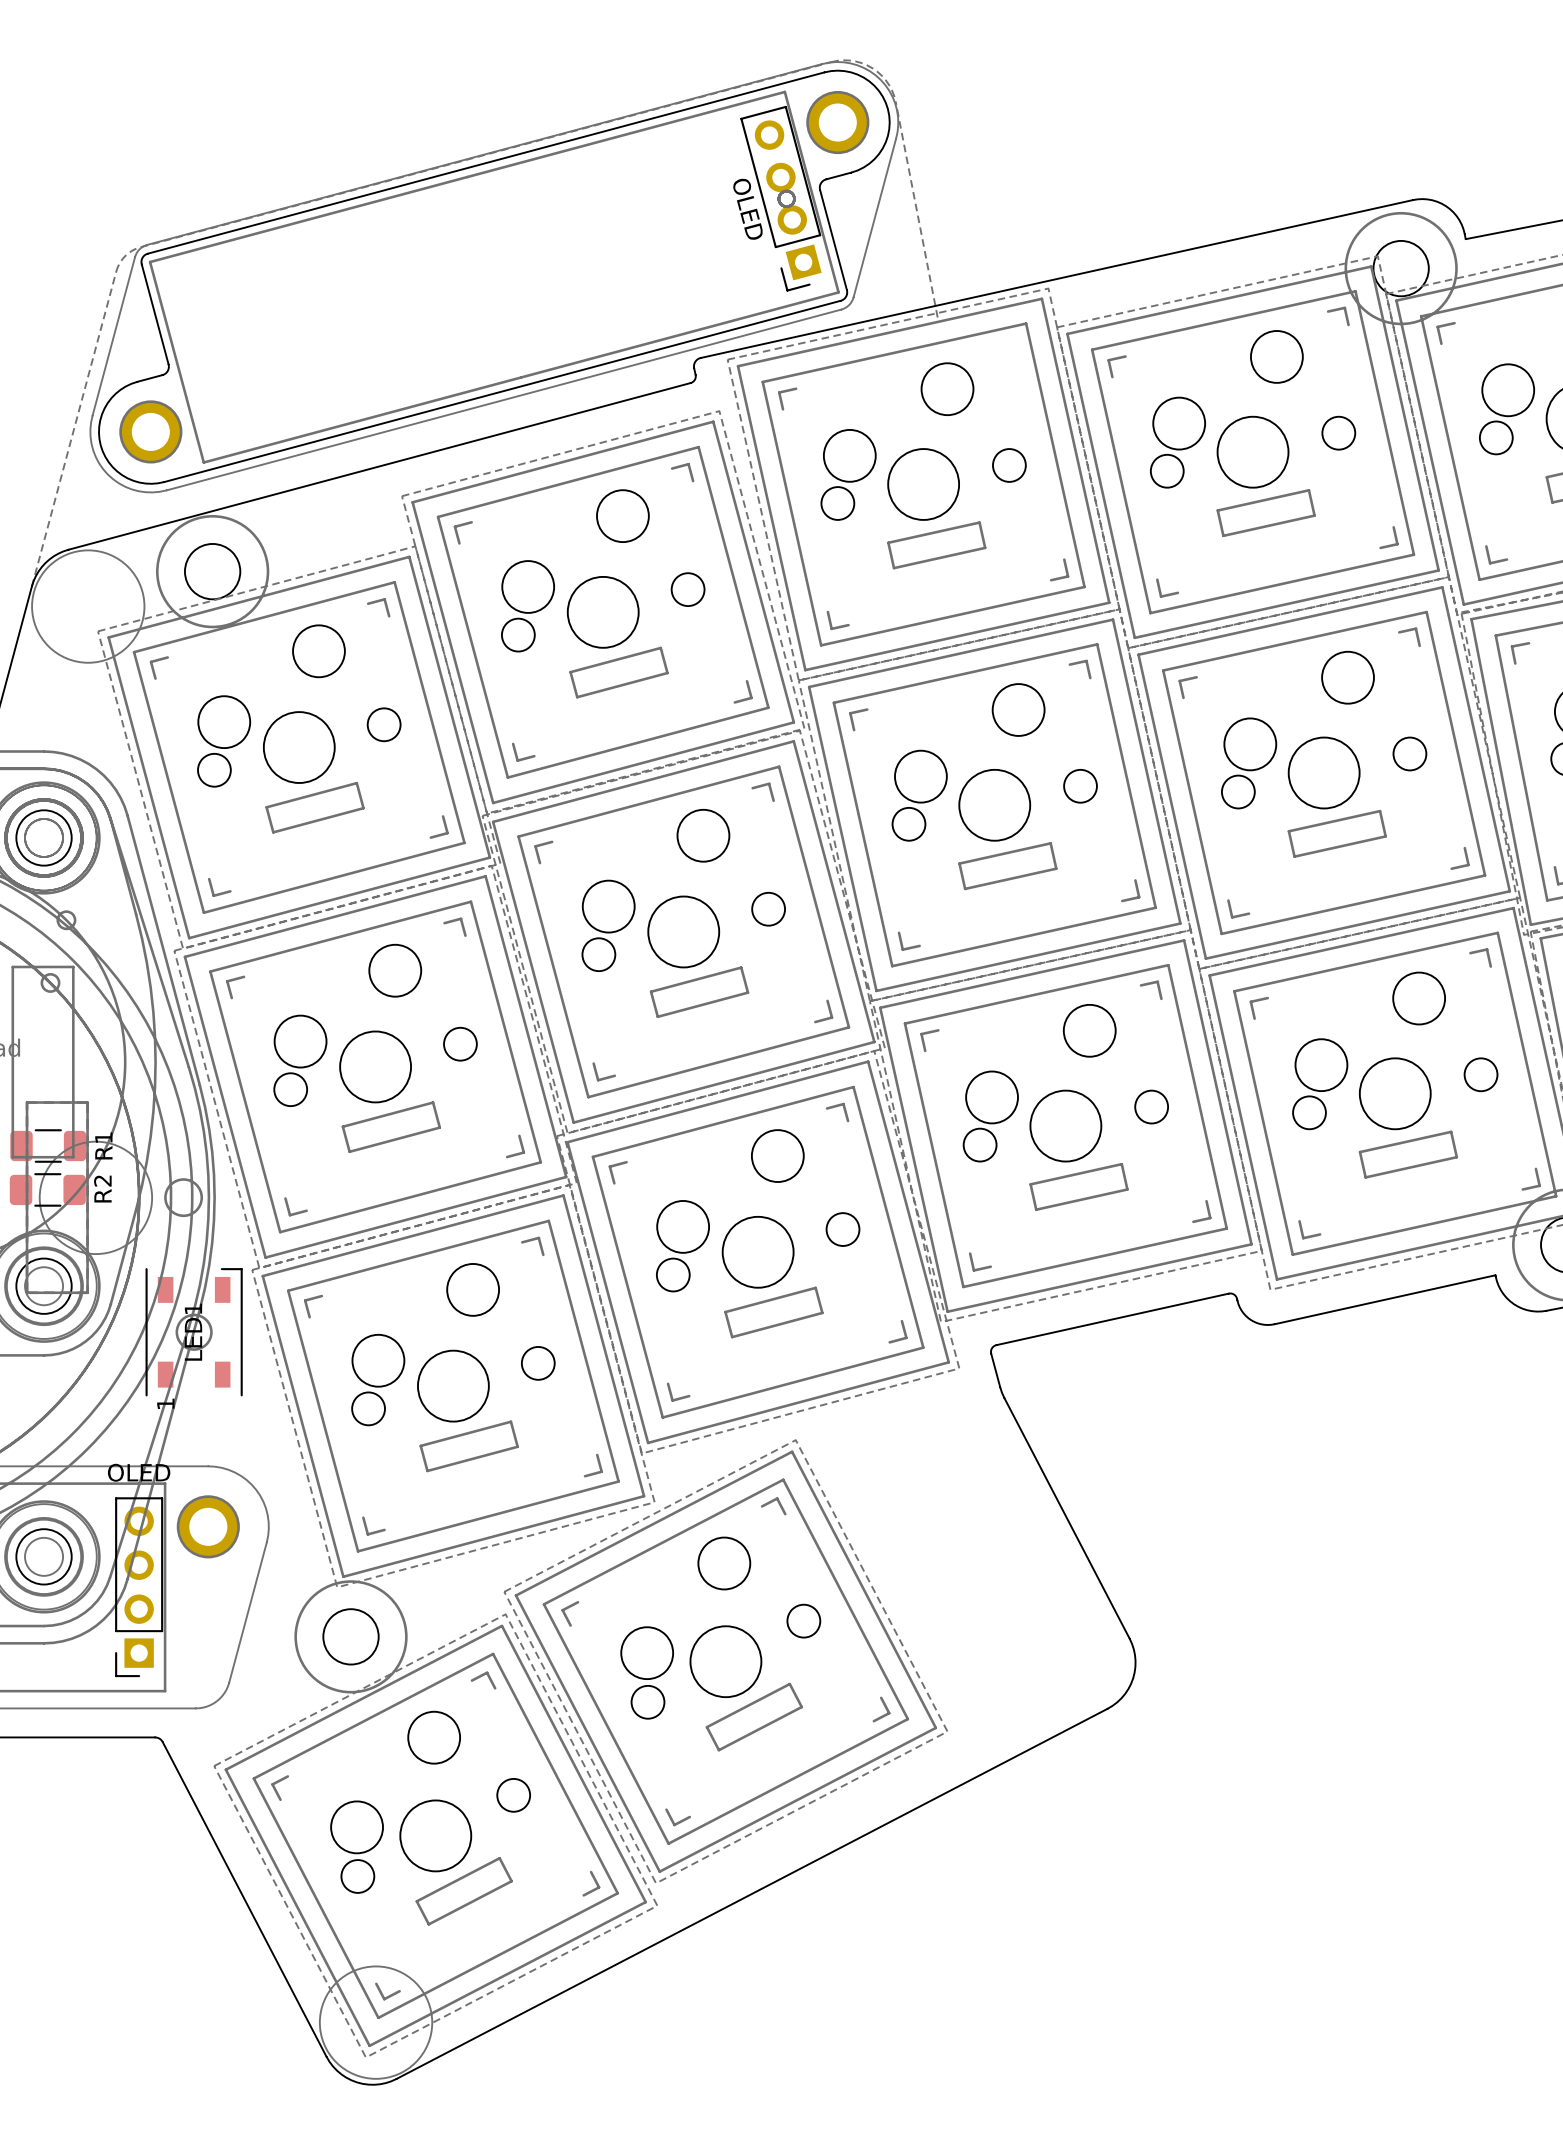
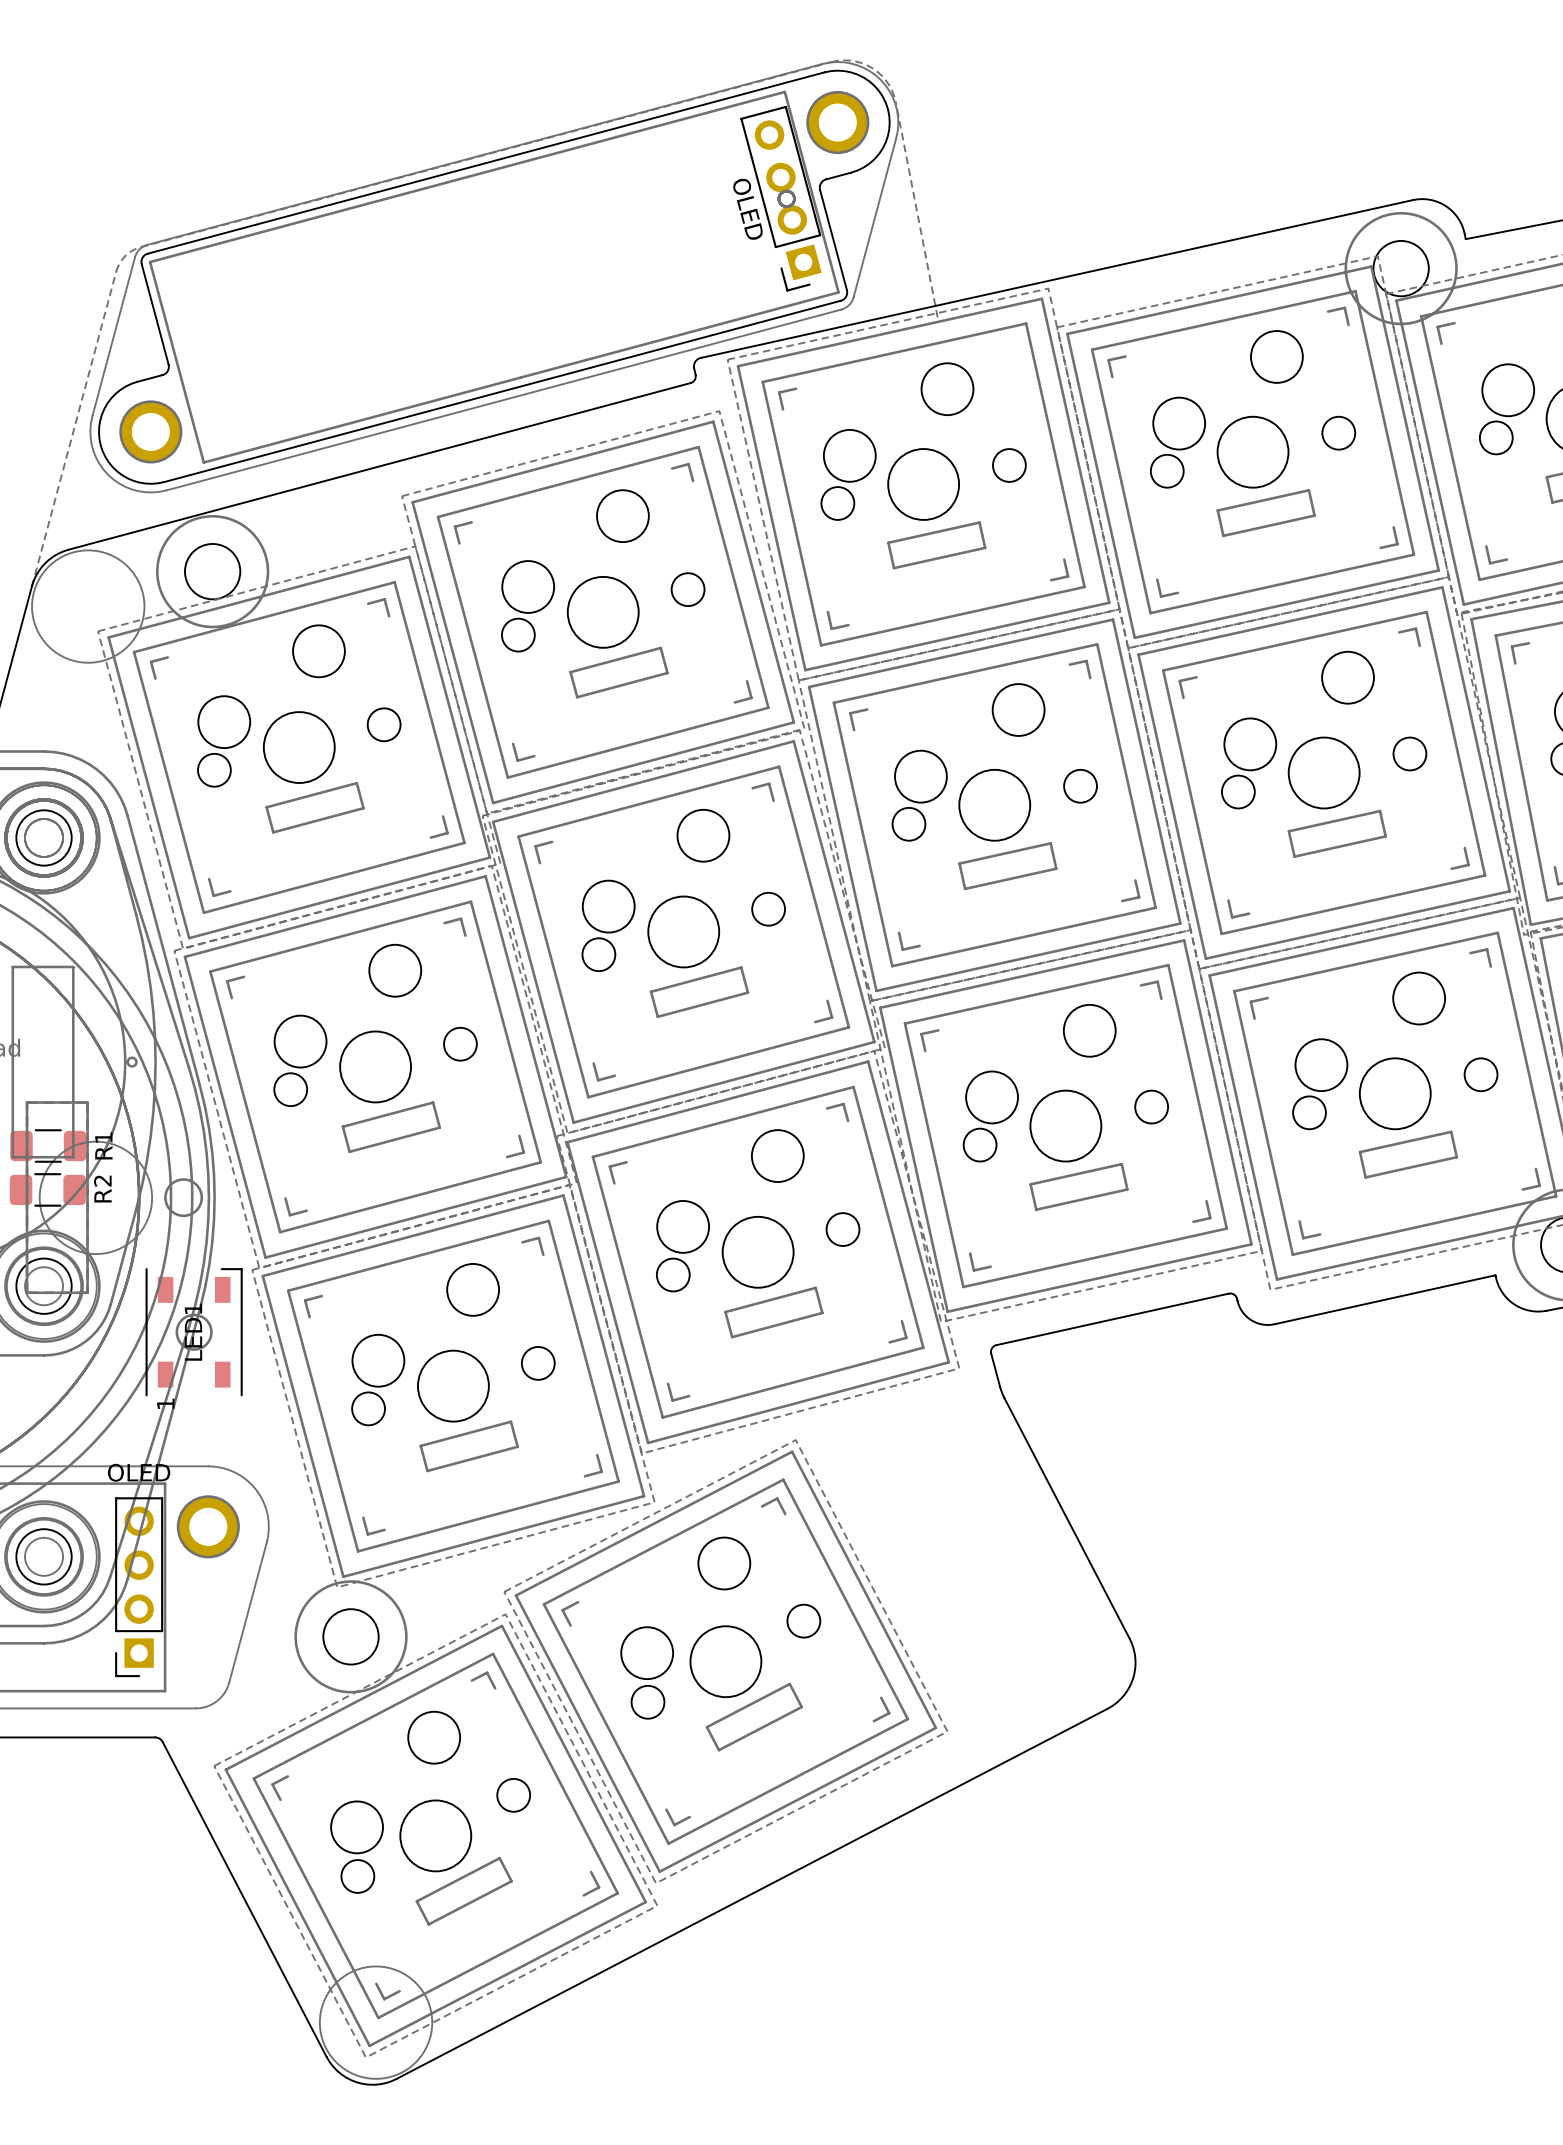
drawing: [56, 910, 77, 931] -> none
drawing: [40, 973, 61, 993] -> none
drawing: none -> [126, 1056, 138, 1068]

